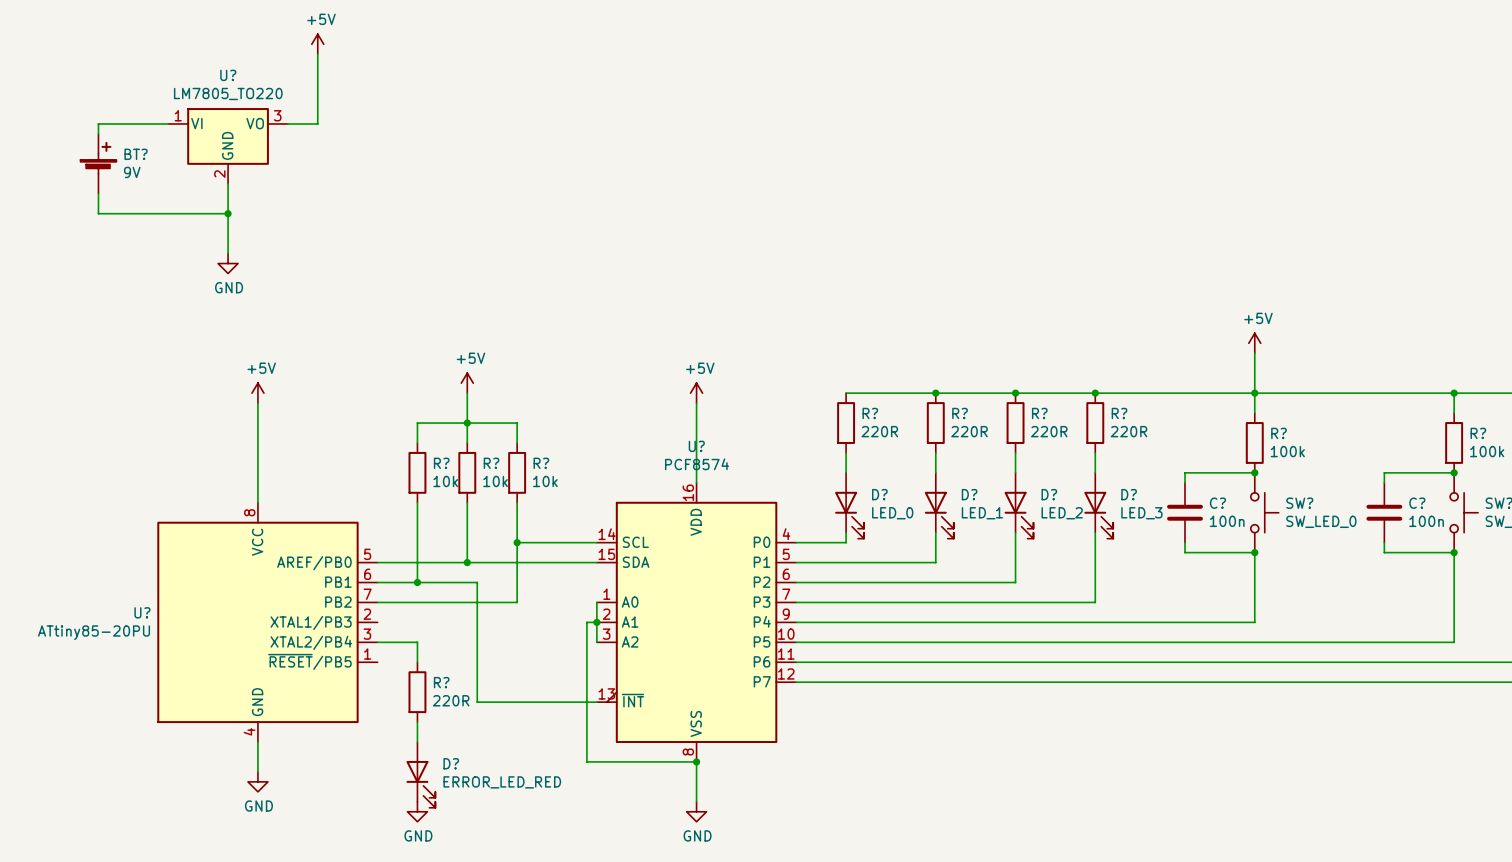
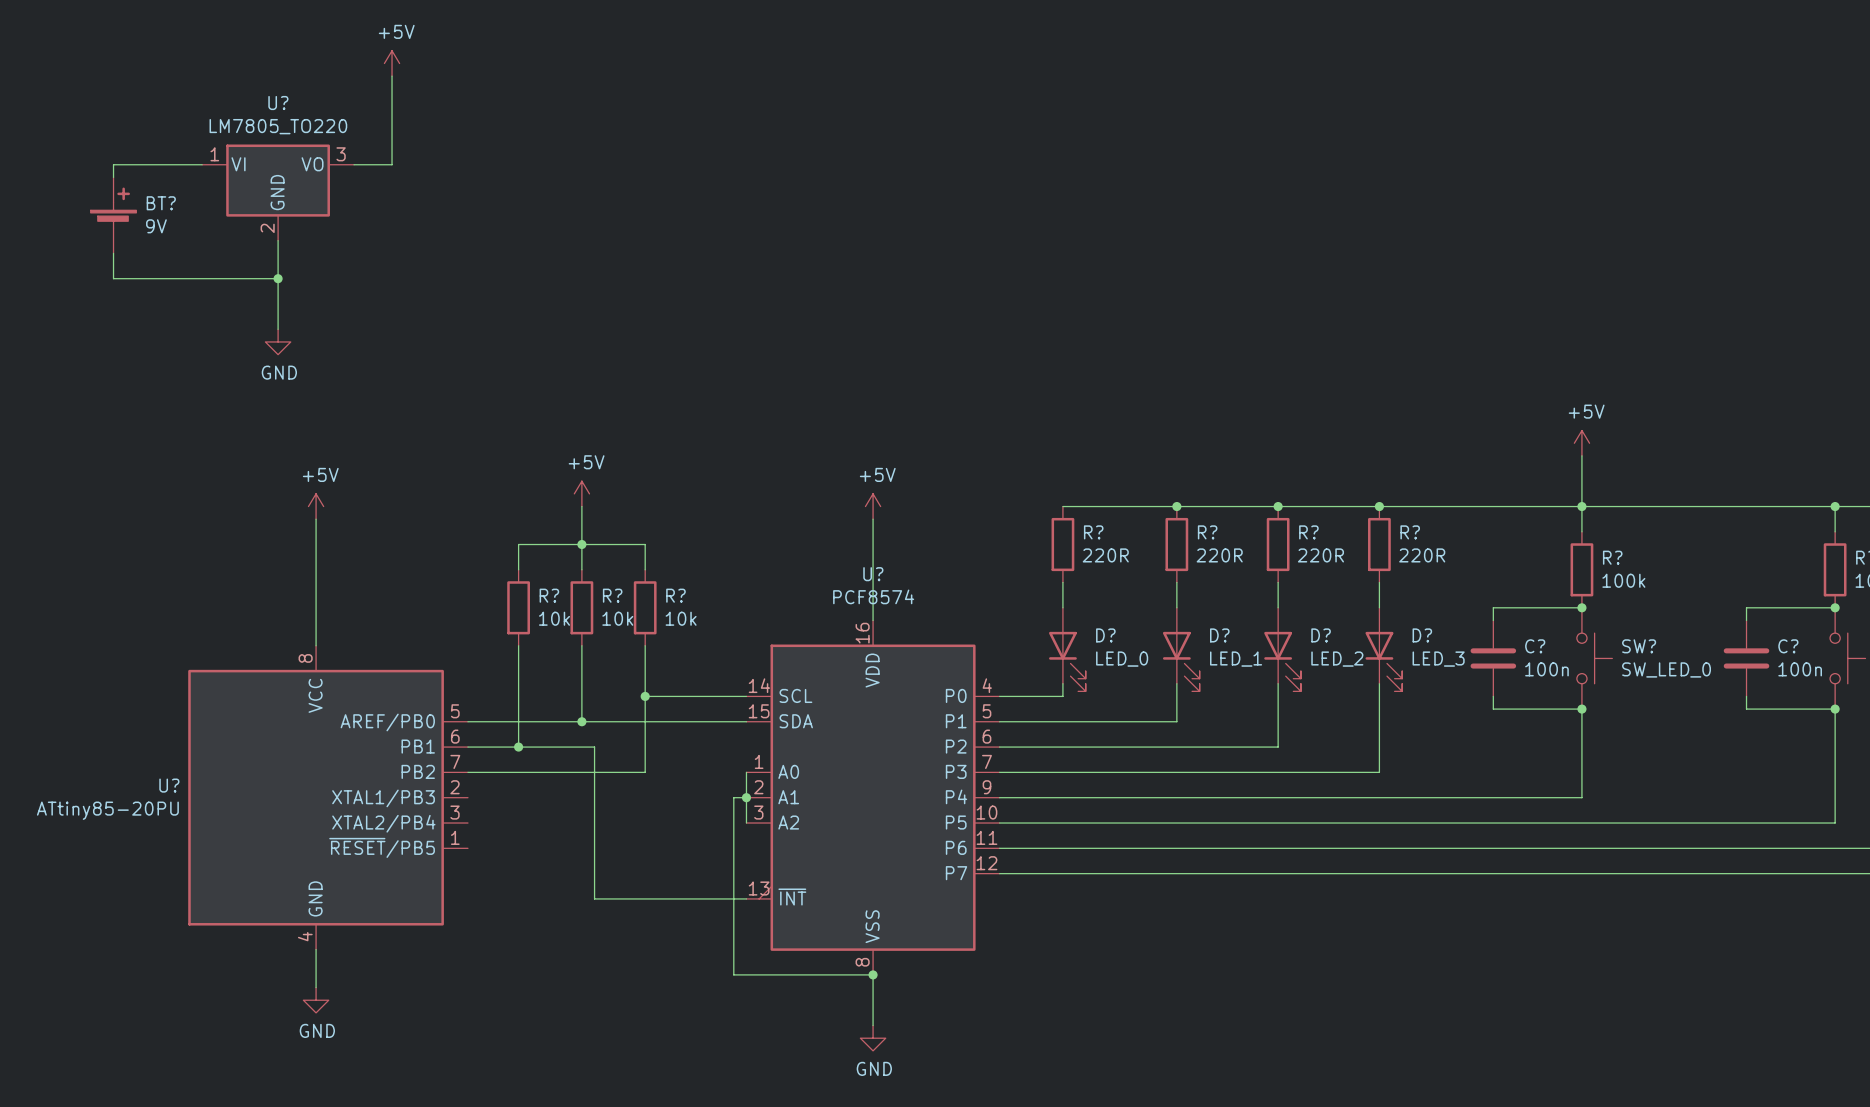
wire: (377, 642) (417, 642) (417, 662) -> none
R?: 220R (417, 692) -> none
wire: (417, 722) (417, 742) -> none
D?: ERROR_LED_RED (420, 774) -> none
power symbol: GND (417, 811) -> none

